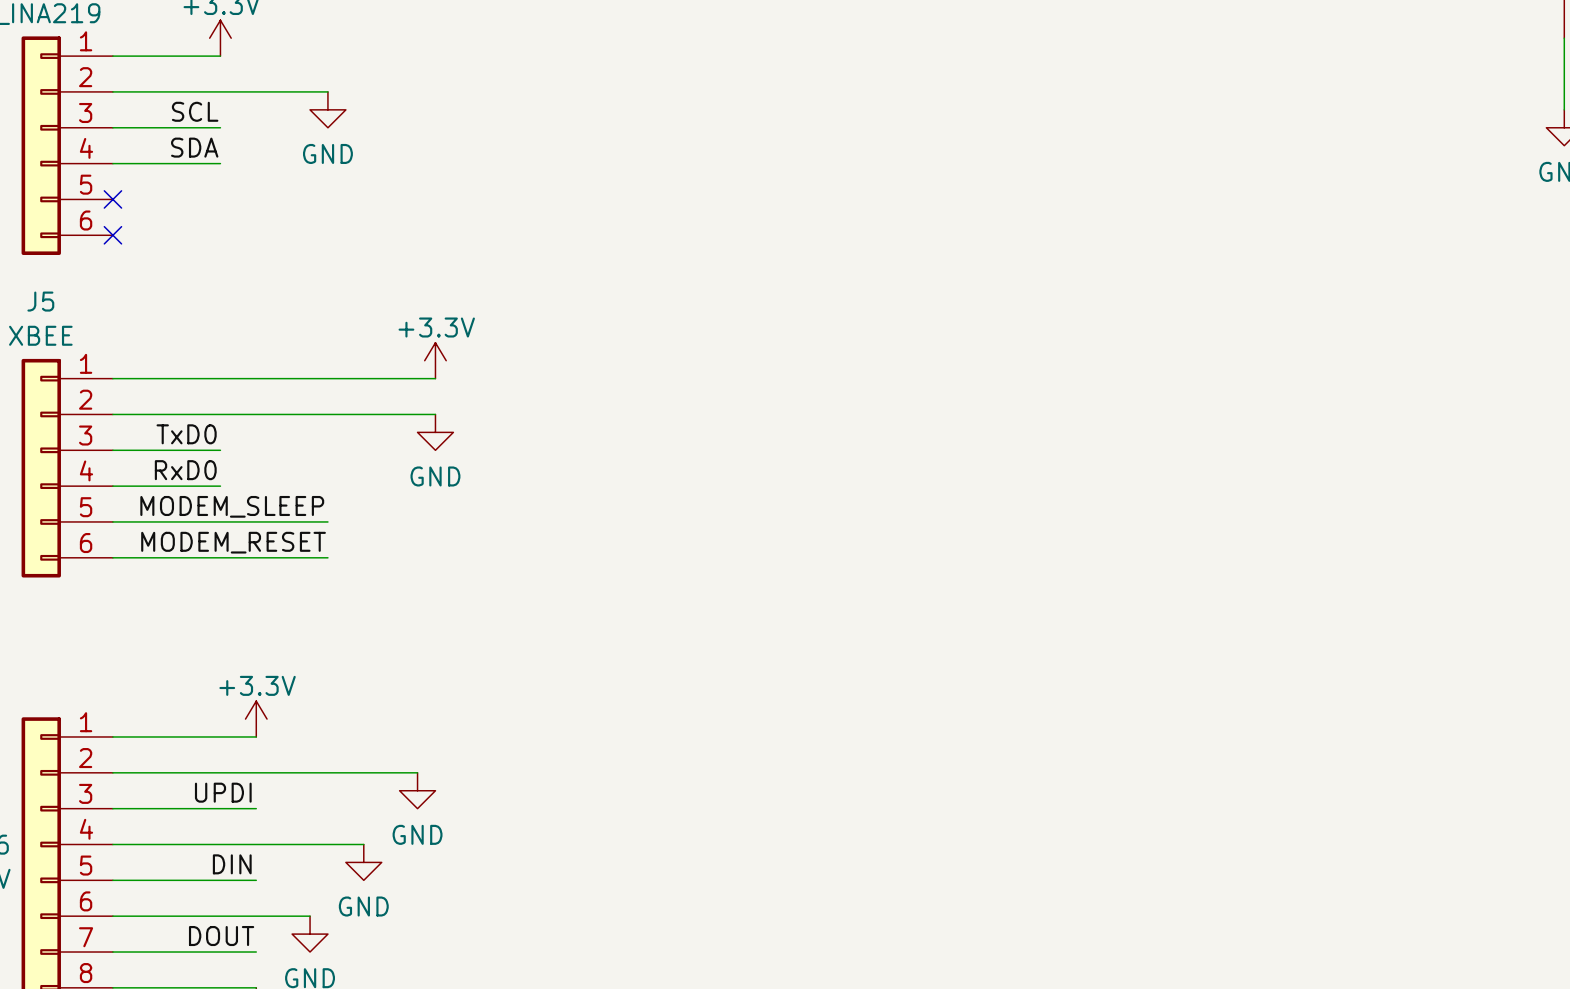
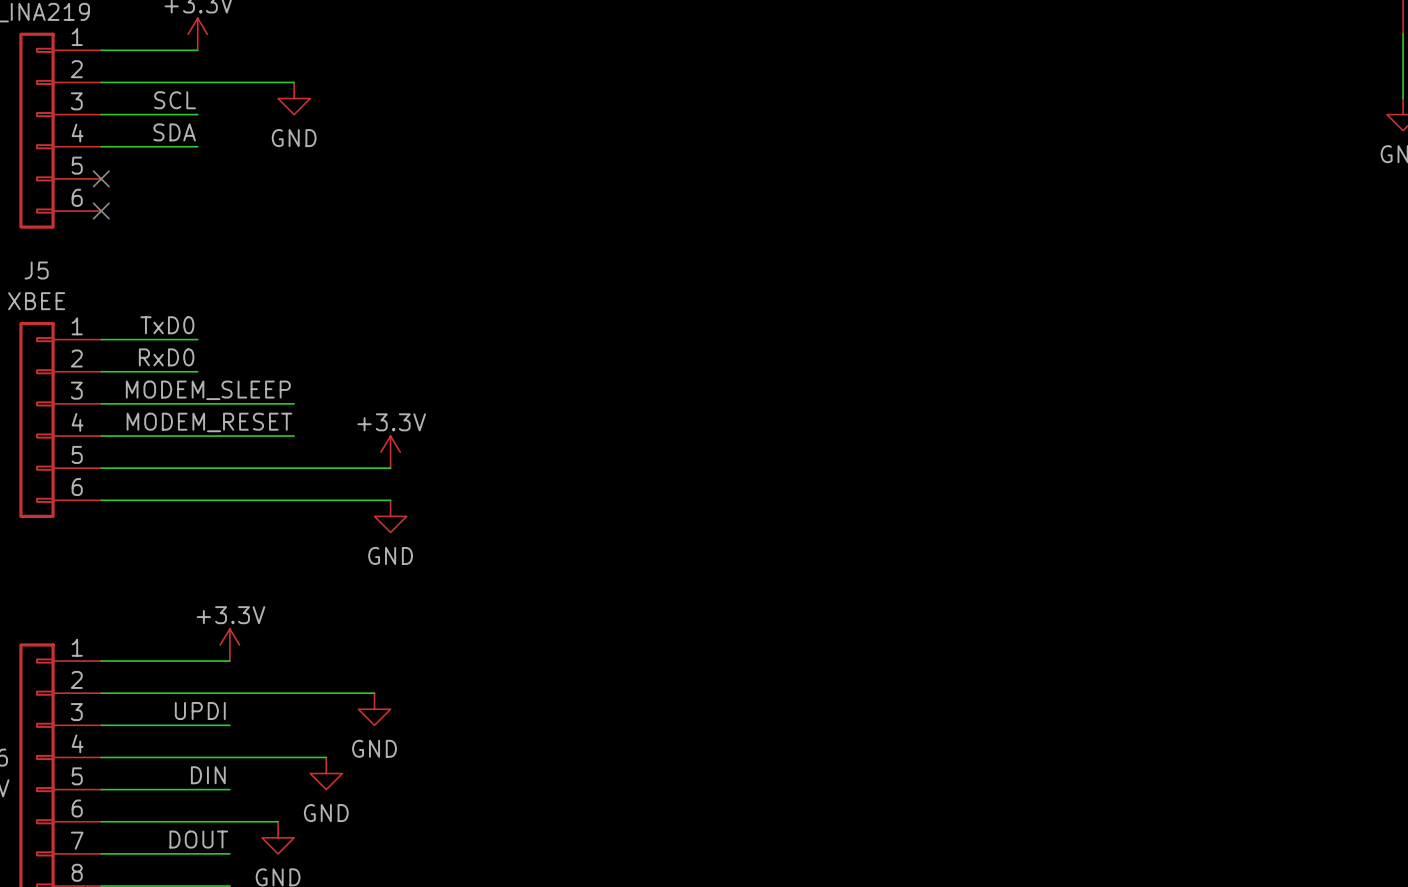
power symbol position: +3.3V (435, 360) -> +3.3V (390, 452)
wire: (220, 378) (435, 378) -> none
wire: (220, 414) (435, 414) -> none
power symbol position: GND (435, 432) -> GND (390, 516)
label position: TxD0 (186, 434) -> TxD0 (167, 325)
wire: none -> (197, 403) (294, 403)
label position: RxD0 (185, 470) -> RxD0 (166, 357)
wire: none -> (197, 436) (294, 436)
label position: MODEM_SLEEP (232, 506) -> MODEM_SLEEP (208, 390)
wire: none -> (294, 468) (390, 468)
label position: MODEM_RESET (233, 542) -> MODEM_RESET (209, 422)
wire: none -> (294, 500) (390, 500)

